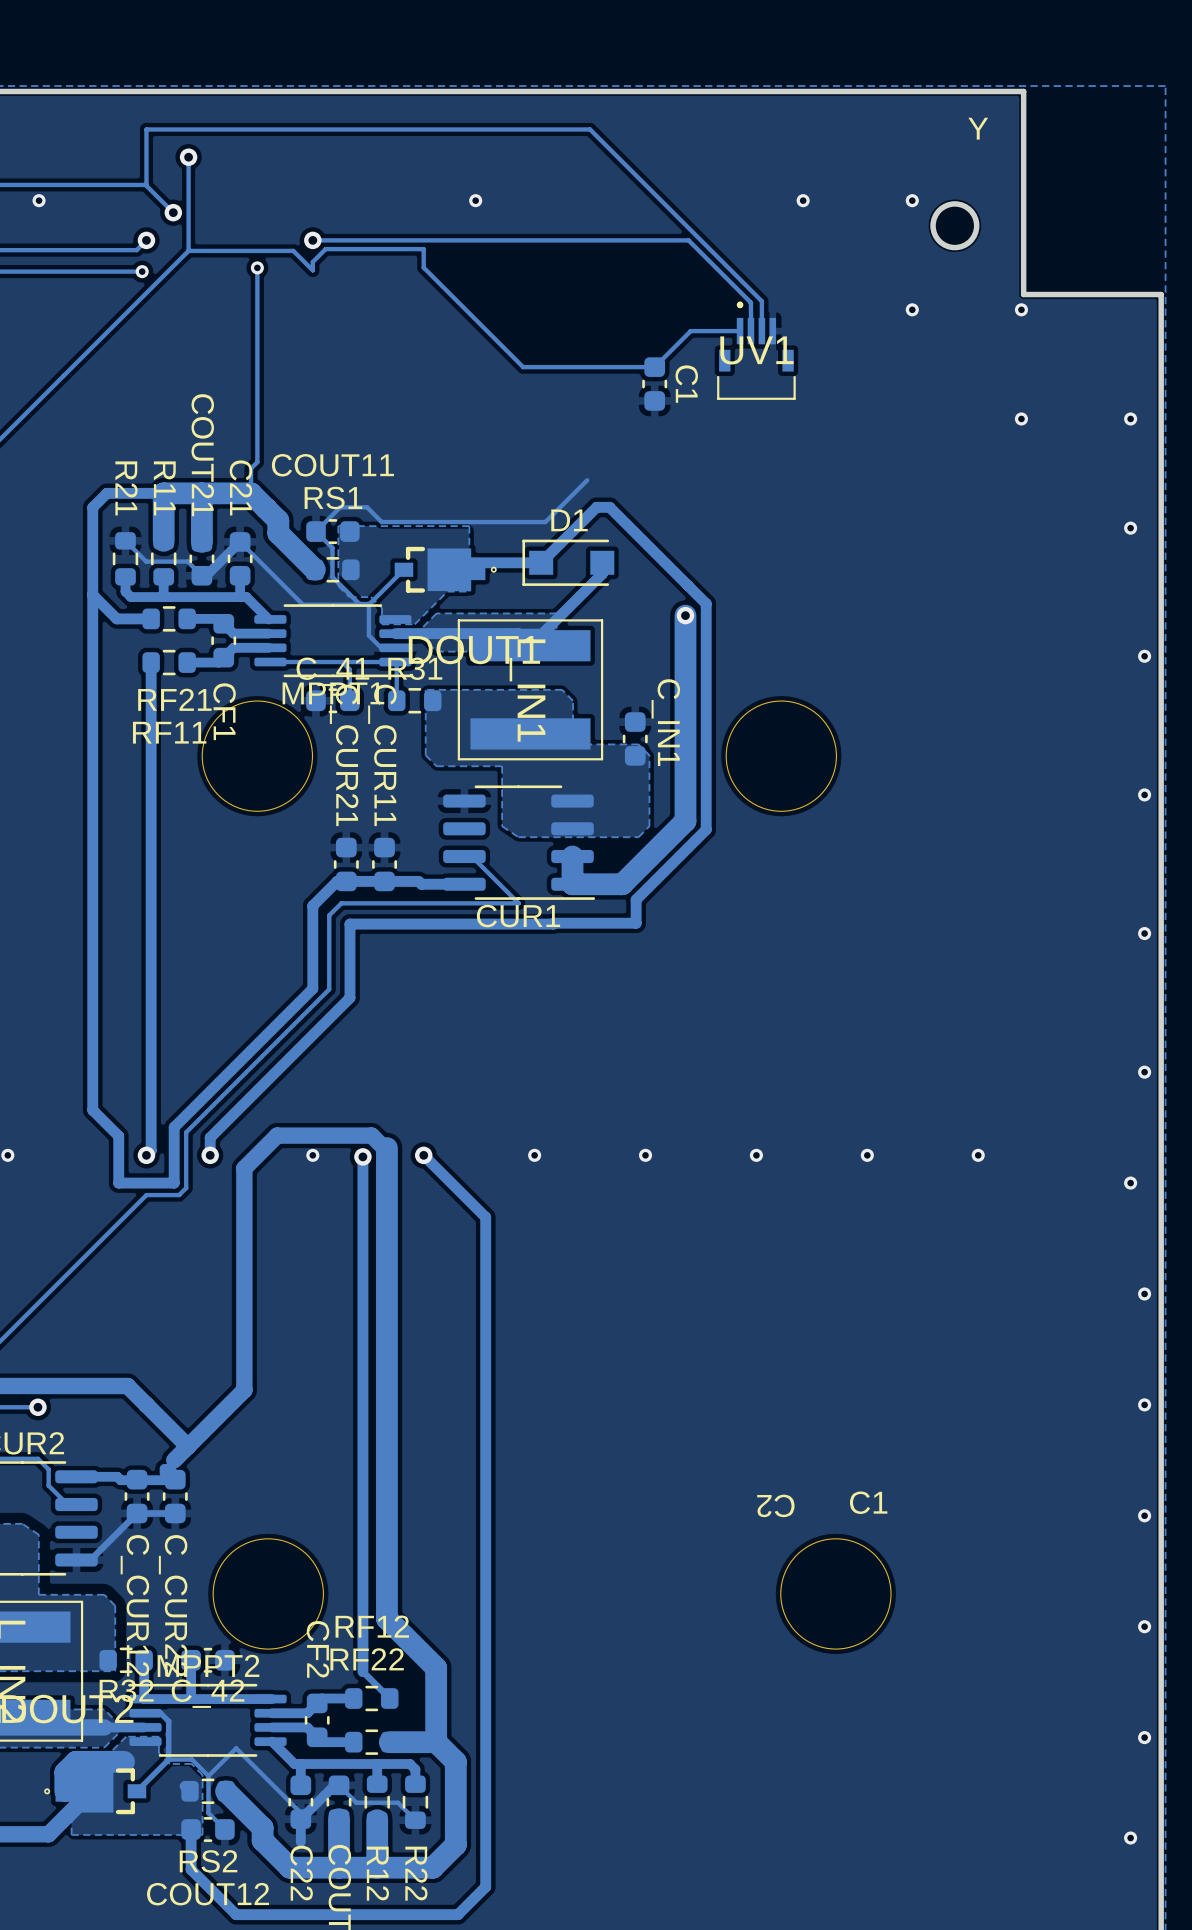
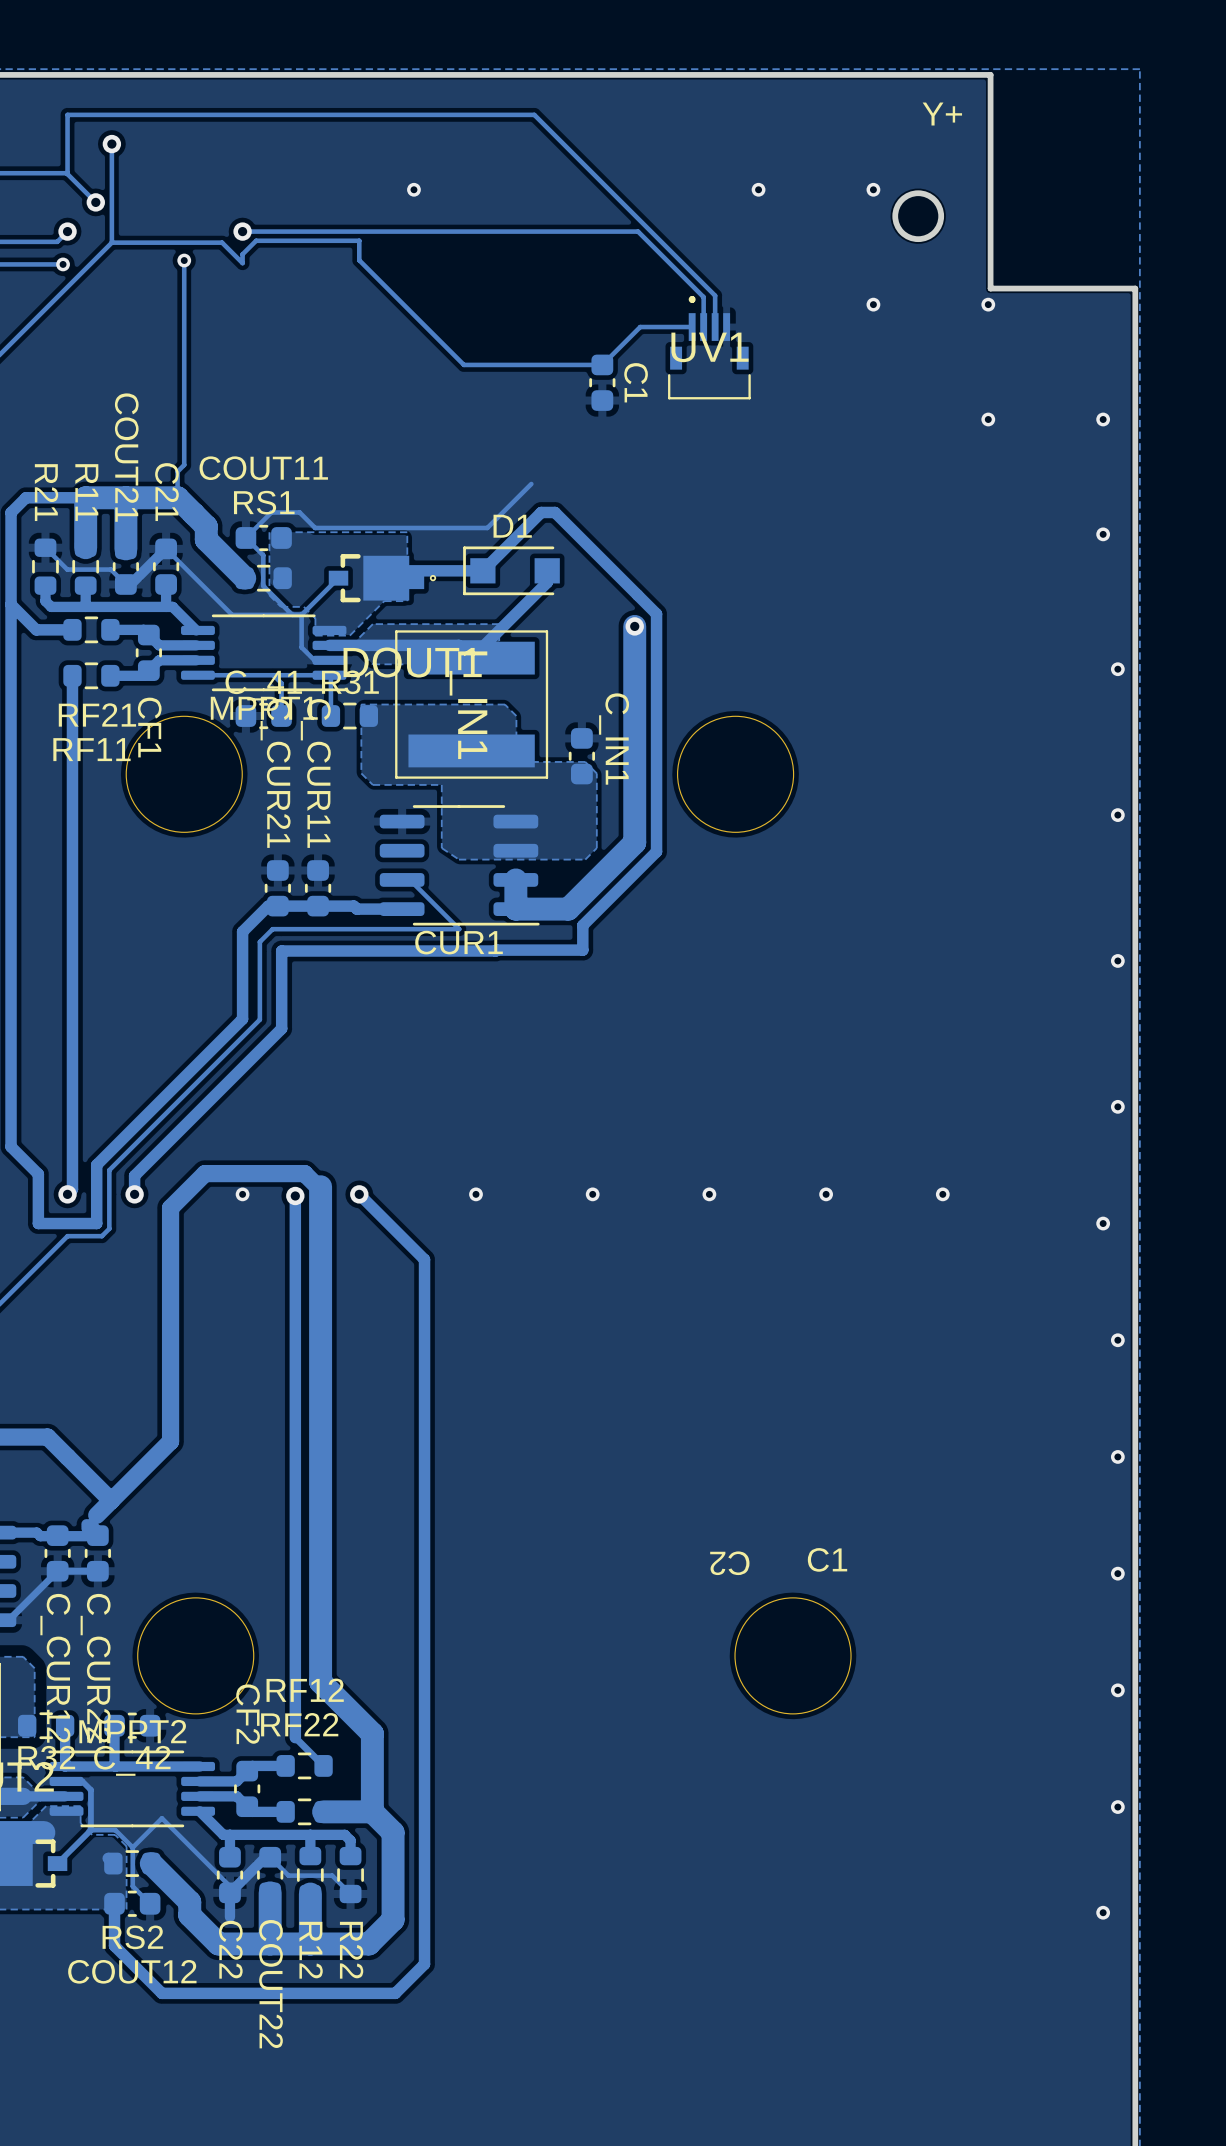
text: Y (978, 128) -> Y+ (942, 114)

